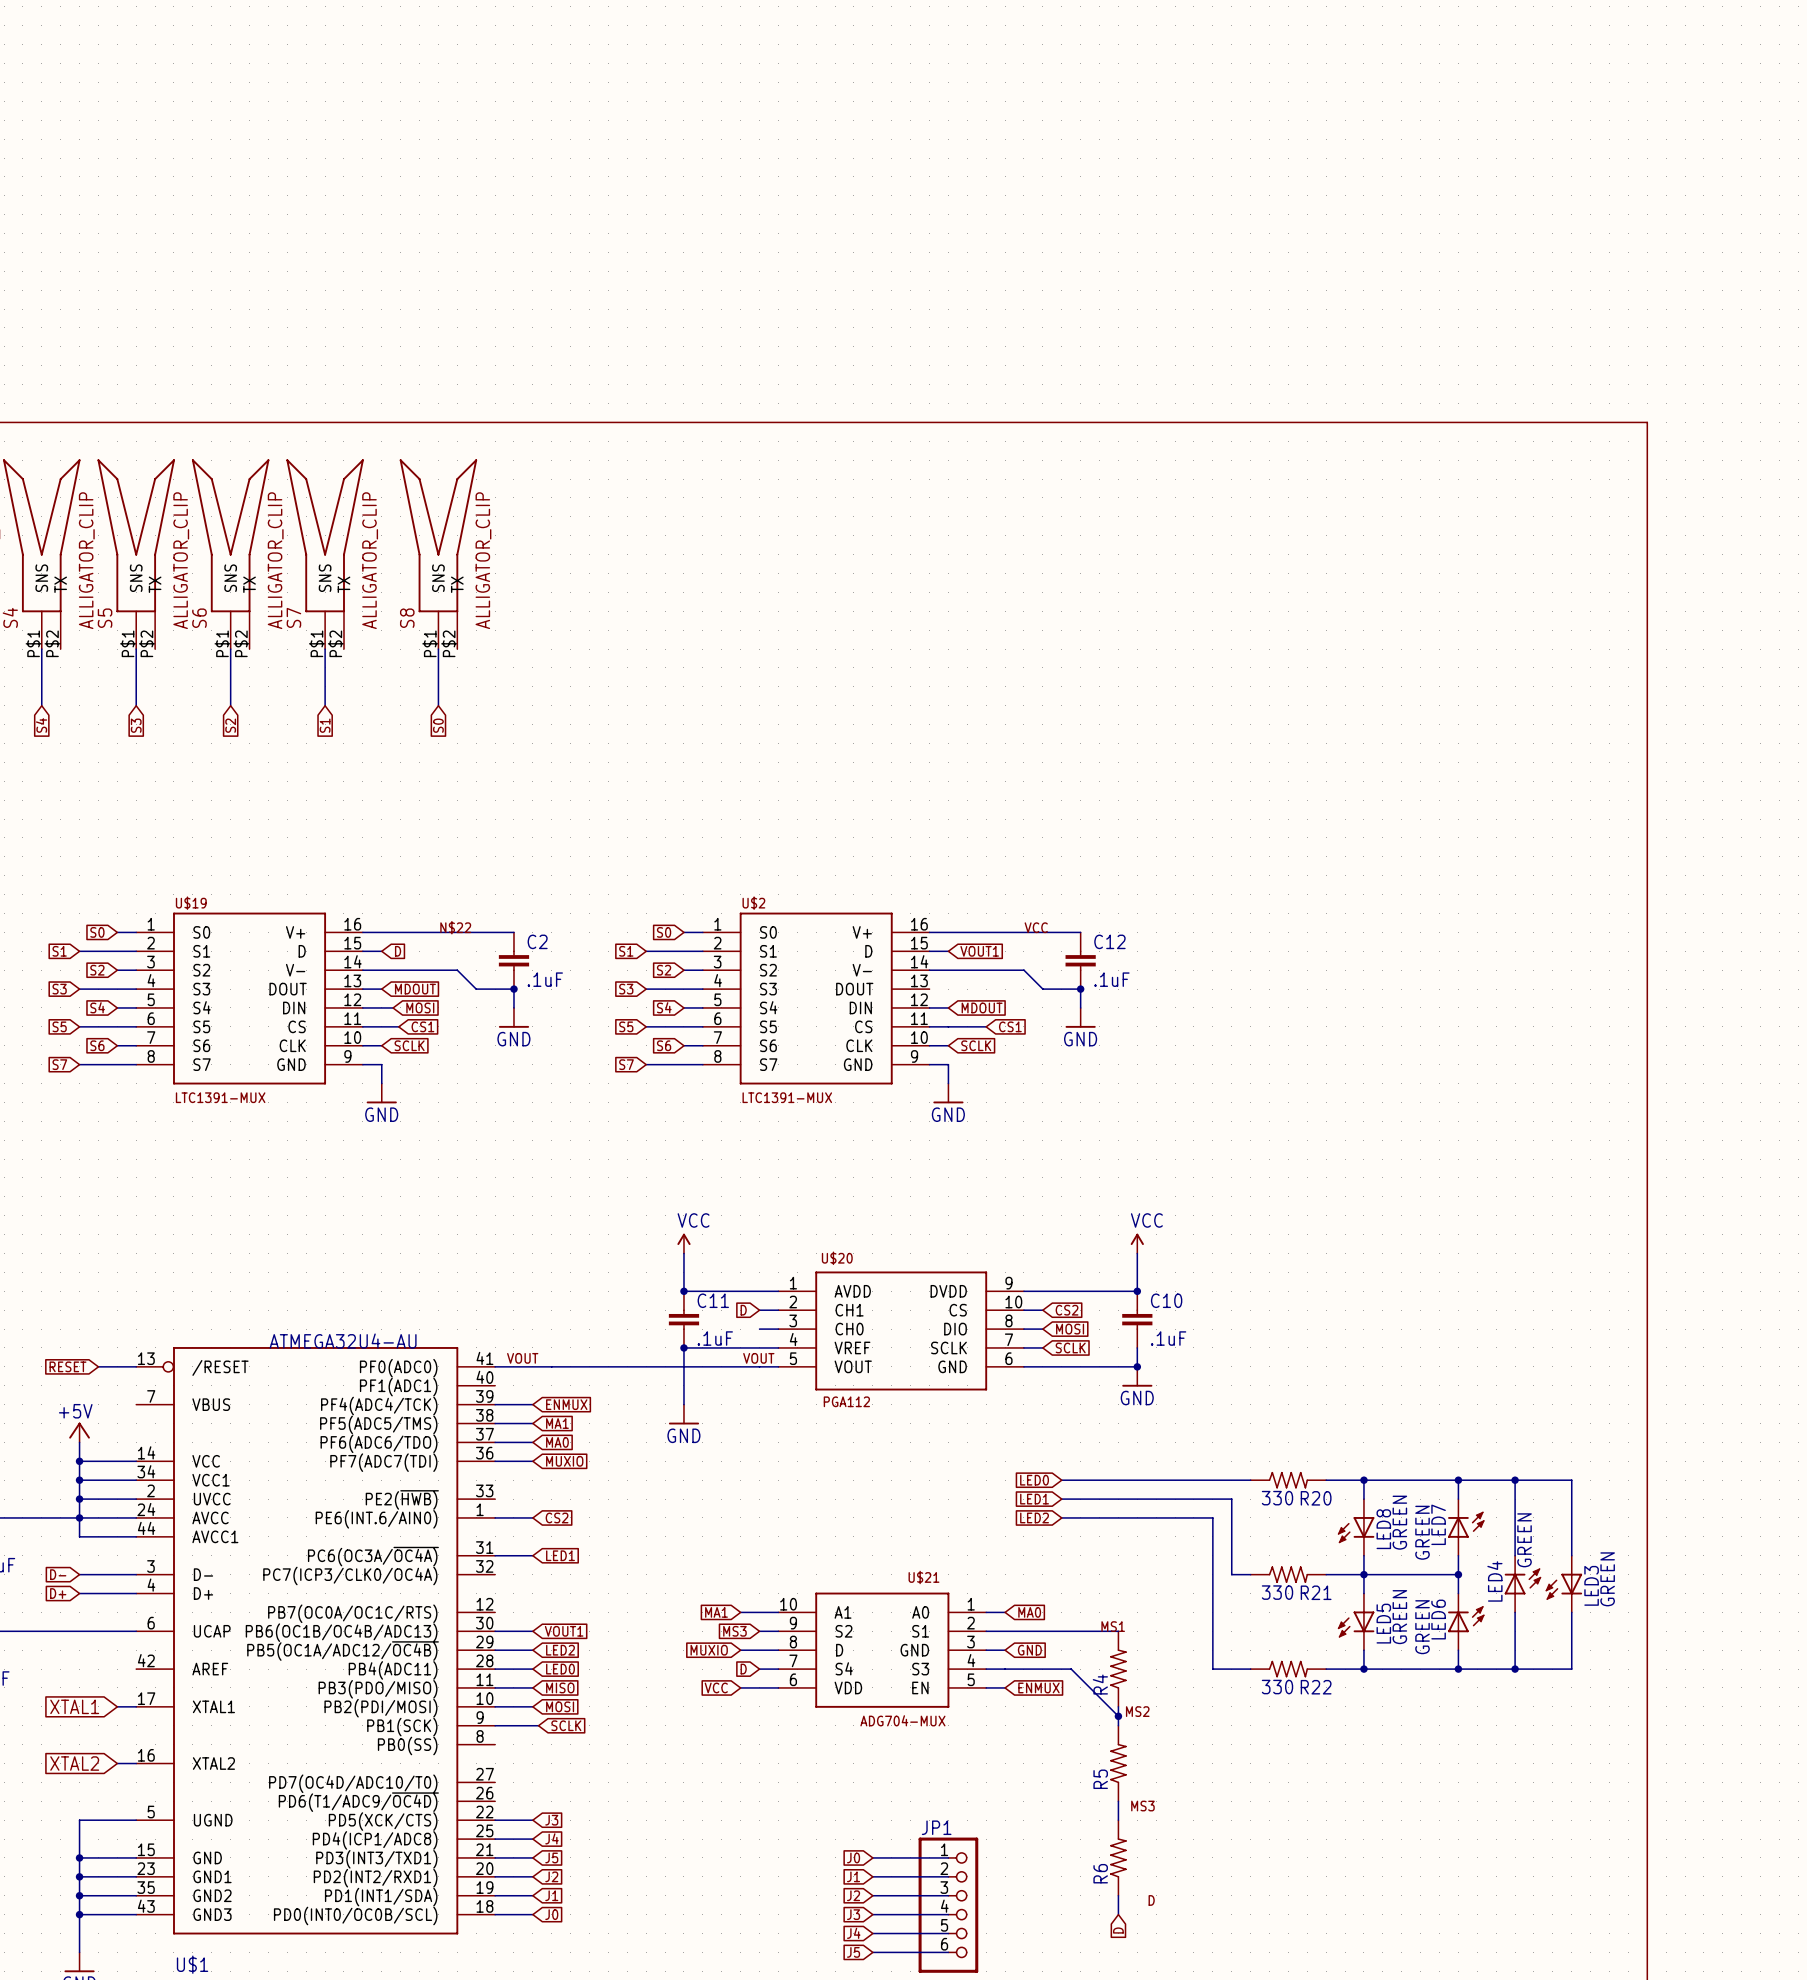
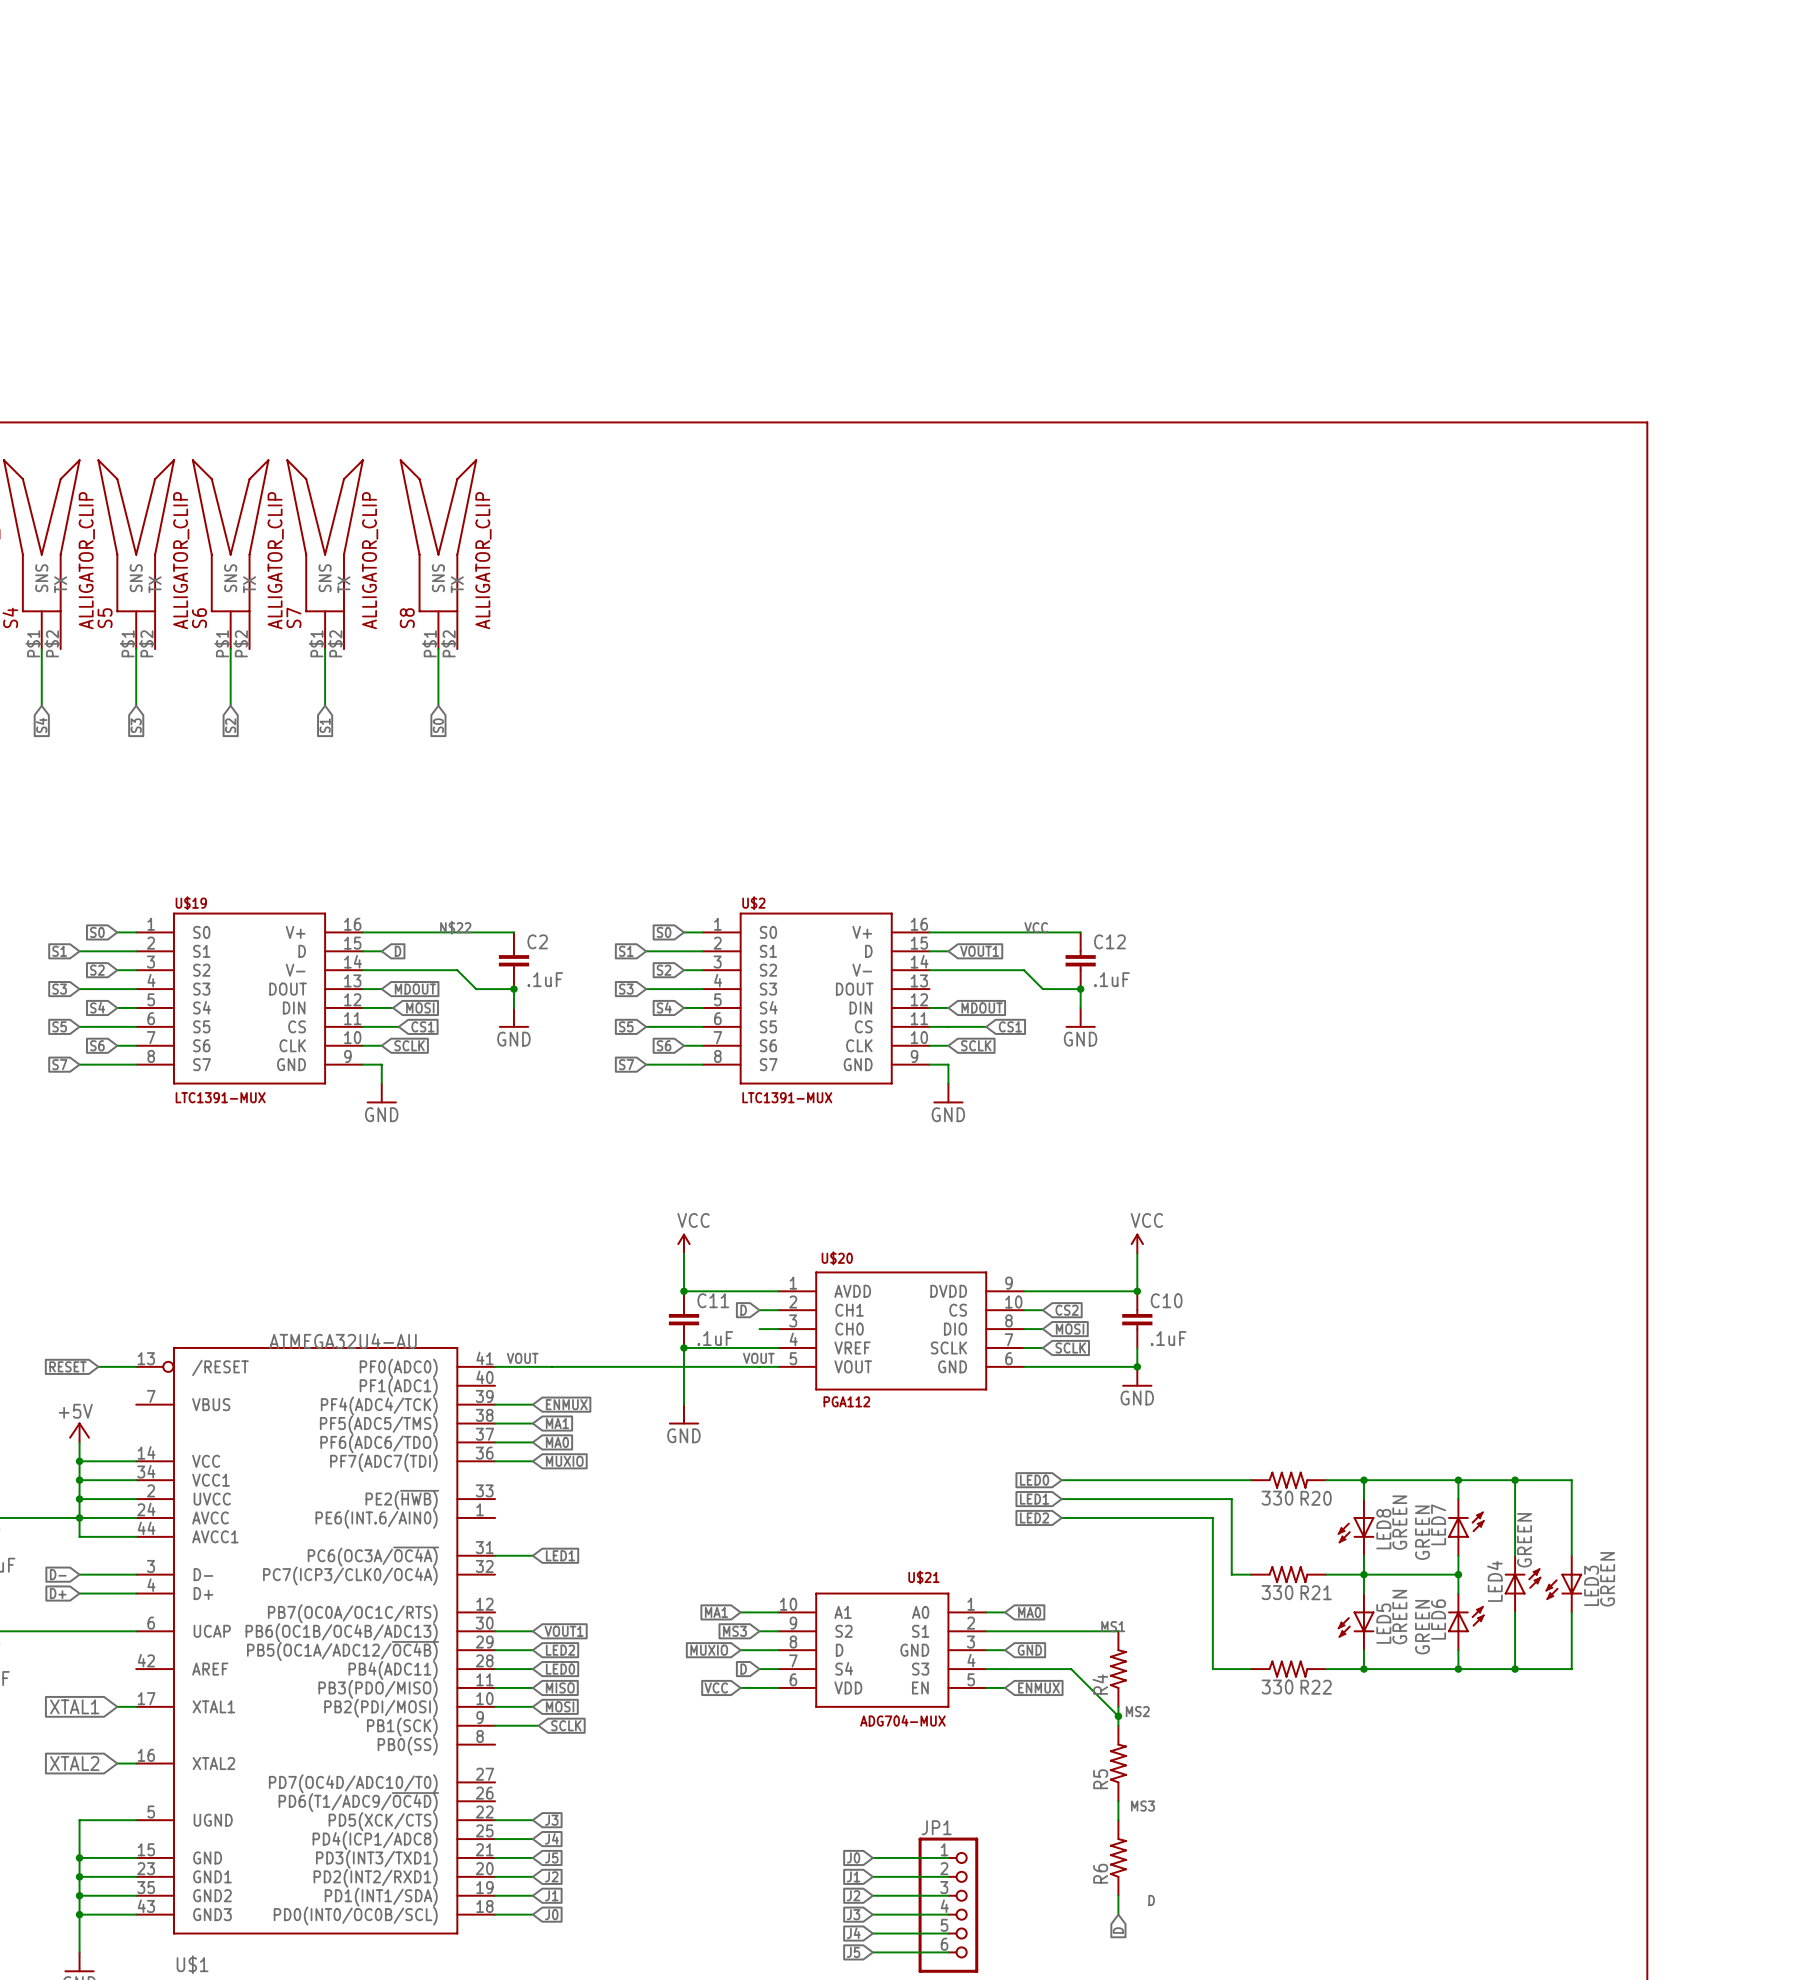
wire: (495, 1517) (532, 1517) -> none
global label: CS2 (557, 1517) -> none

